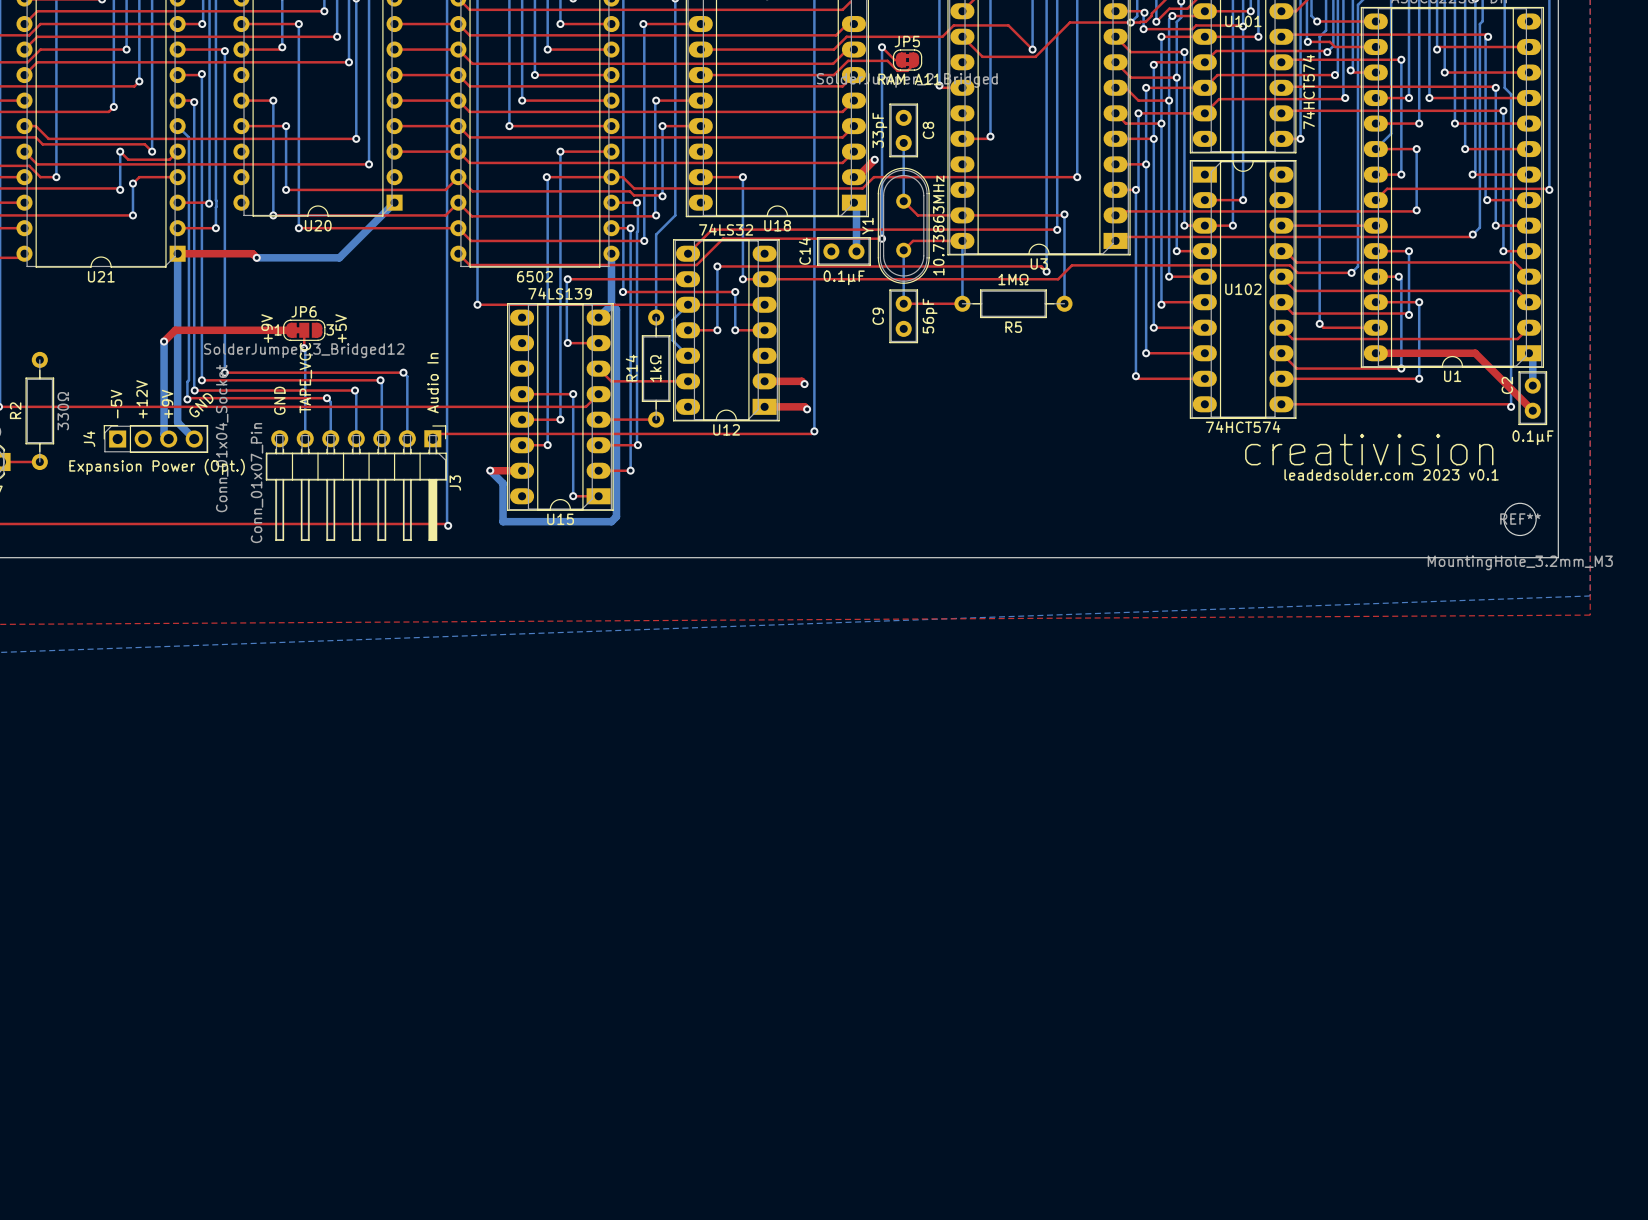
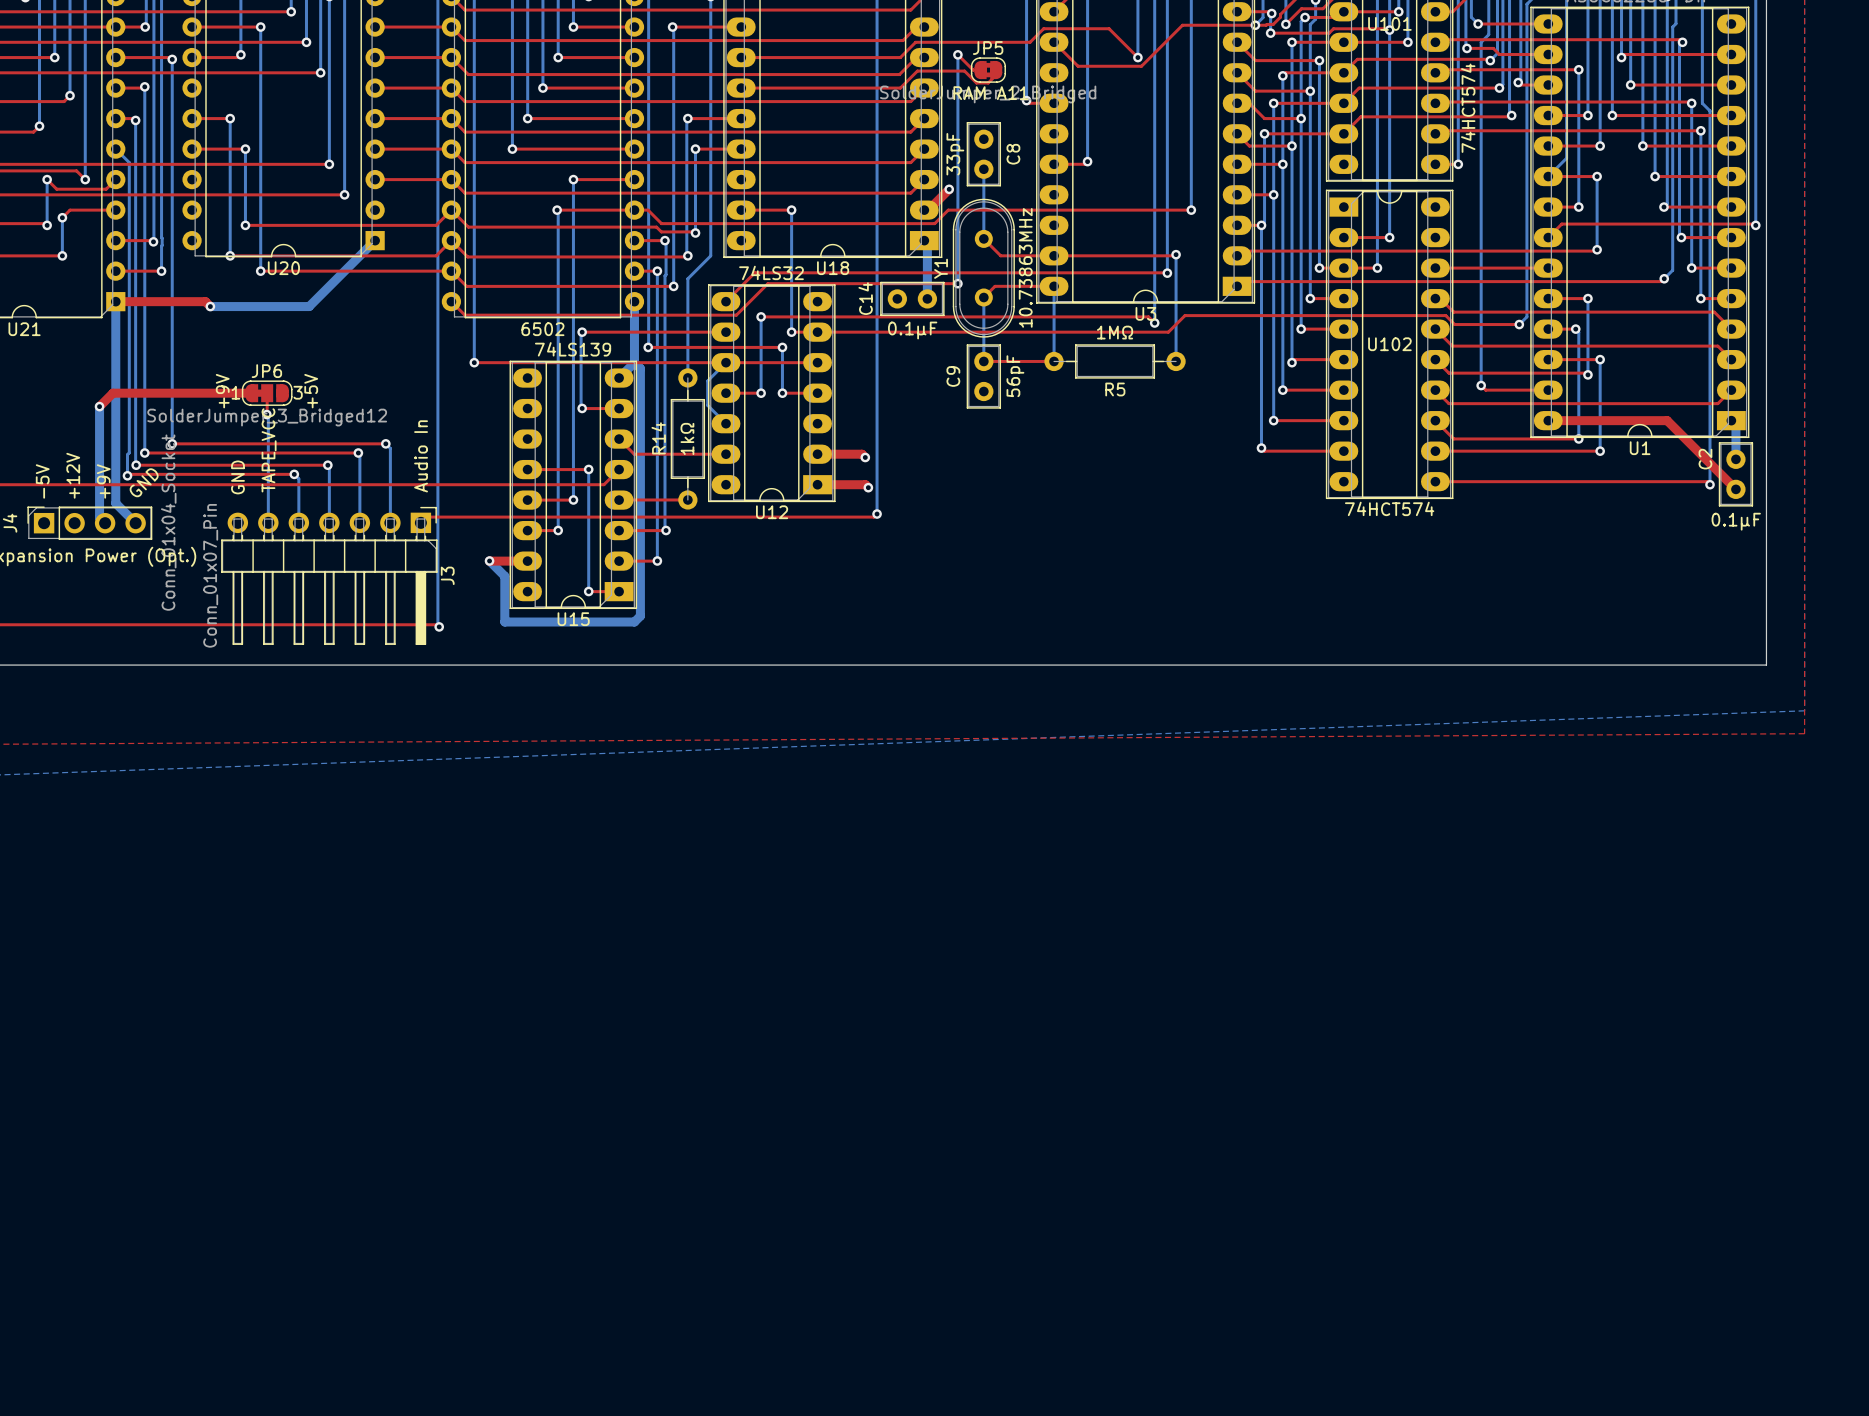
text: creativision (1369, 449) -> none
text: leadedsolder.com 2023 v0.1 (1391, 474) -> none
REF**: MountingHole_3.2mm_M3 (1520, 519) -> none

